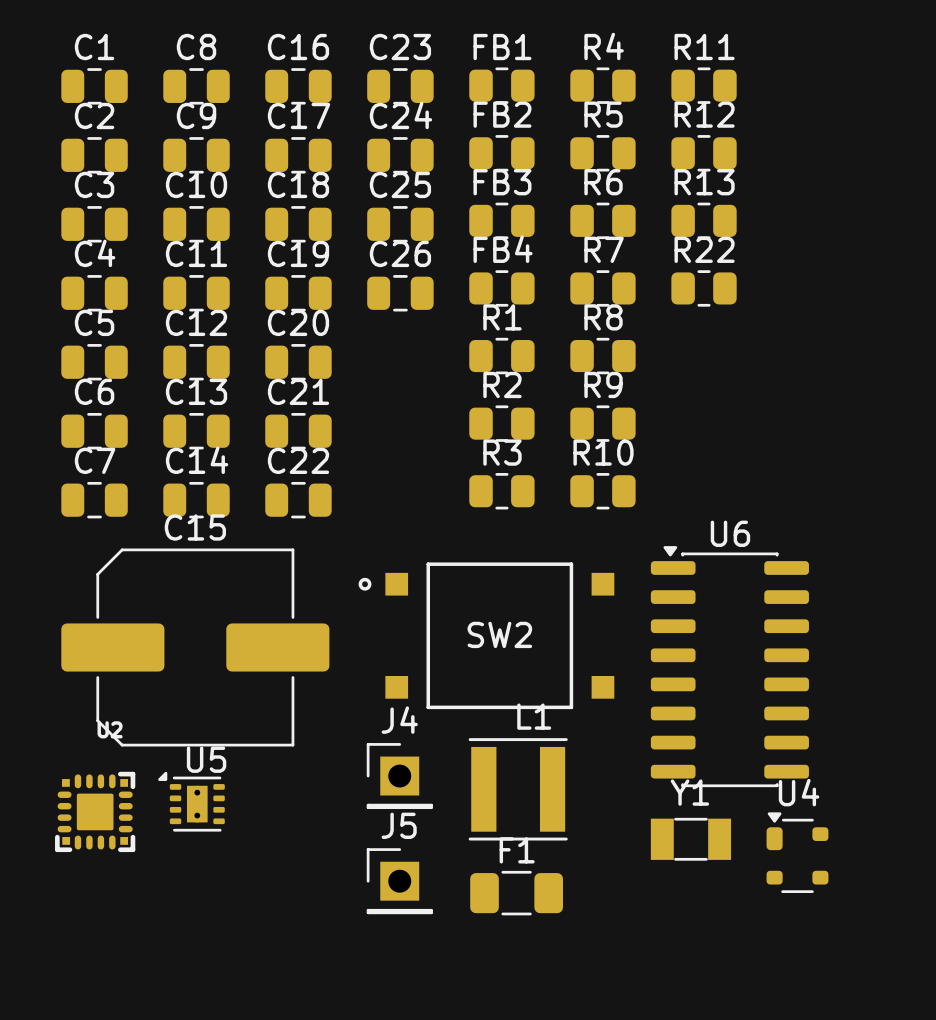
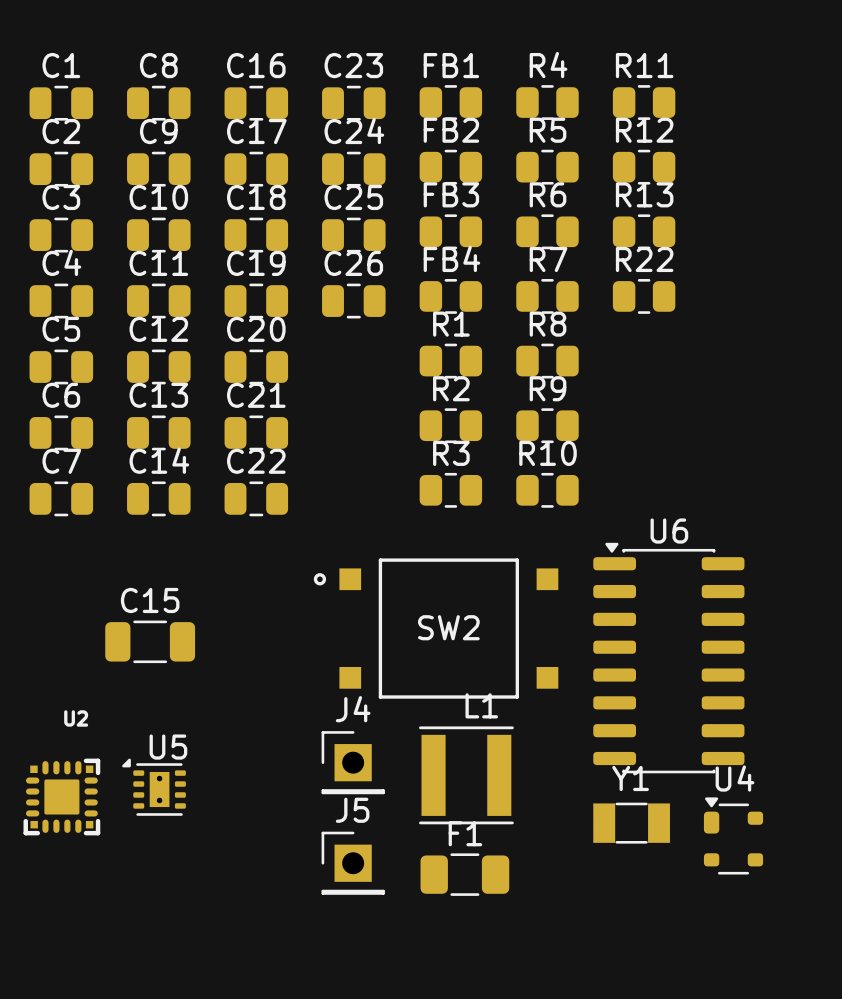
C15 name position: C15 (195, 527) -> C15 (150, 600)
C15 footprint: [61, 548, 330, 747] -> [105, 620, 196, 664]

